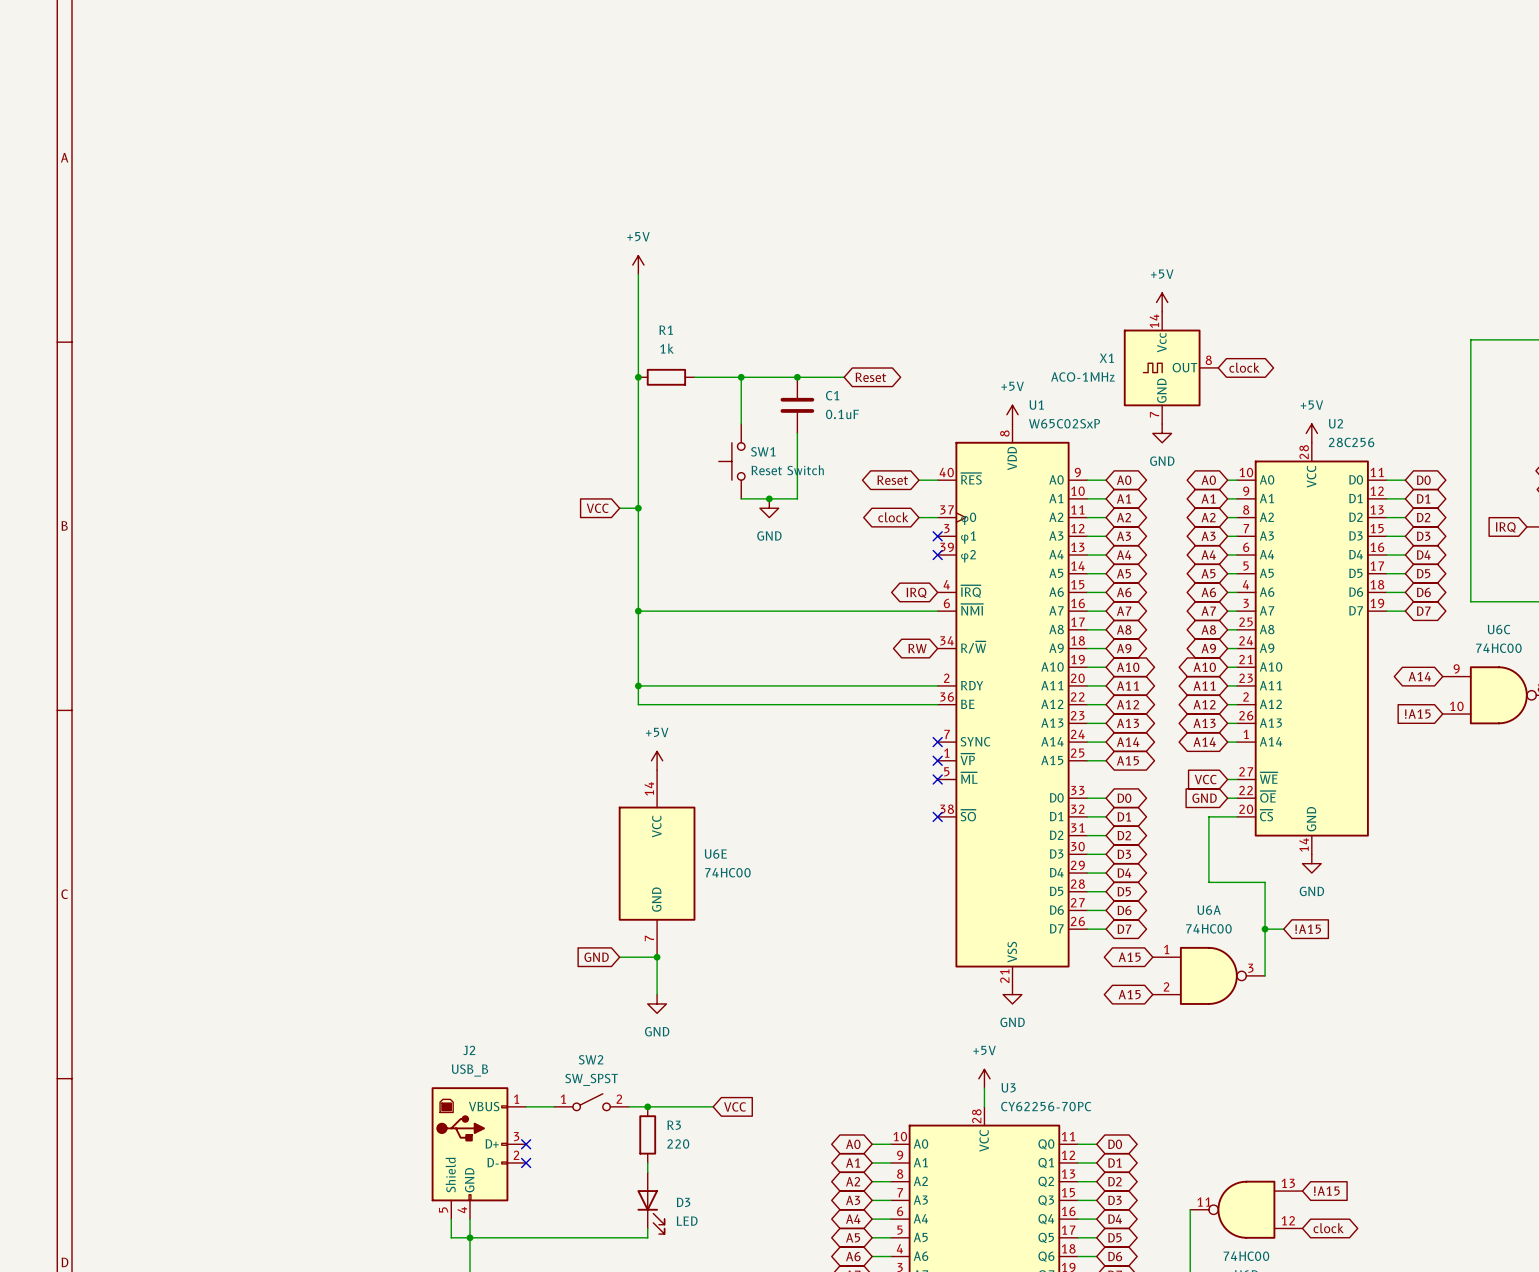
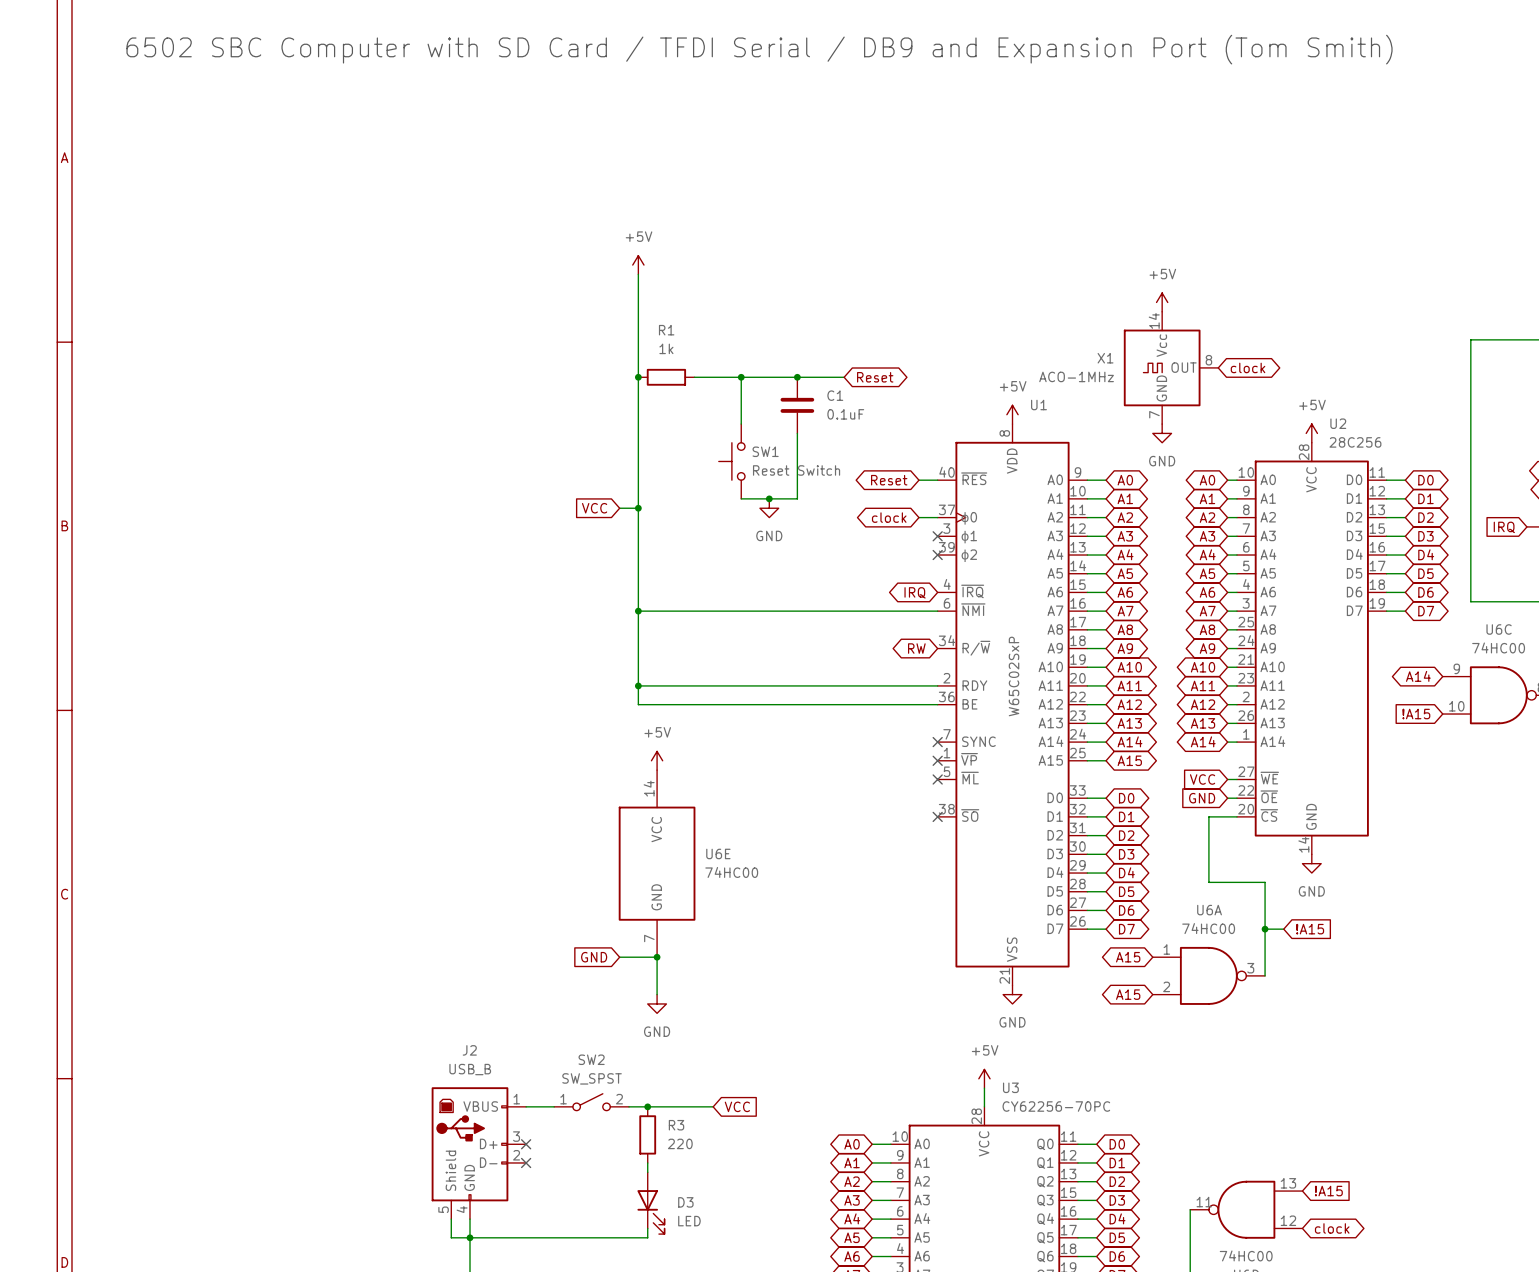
text: none -> 6502 SBC Computer with SD Card / TFDI Serial / DB9 and Expansion Port (Tom Smith) (759, 49)
U1 value rotation: 0° (1064, 423) -> 90° counterclockwise (1014, 676)
U1 value position: W65C02SxP (1064, 423) -> W65C02SxP (1014, 676)

